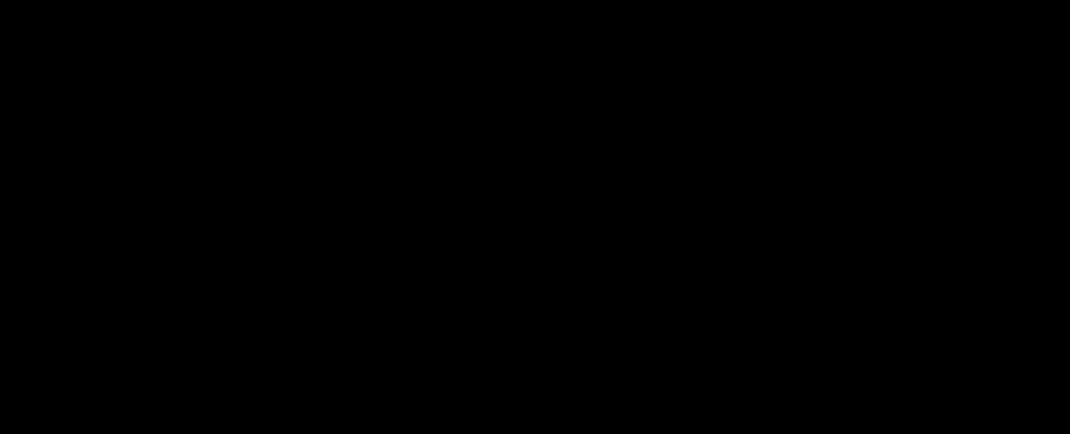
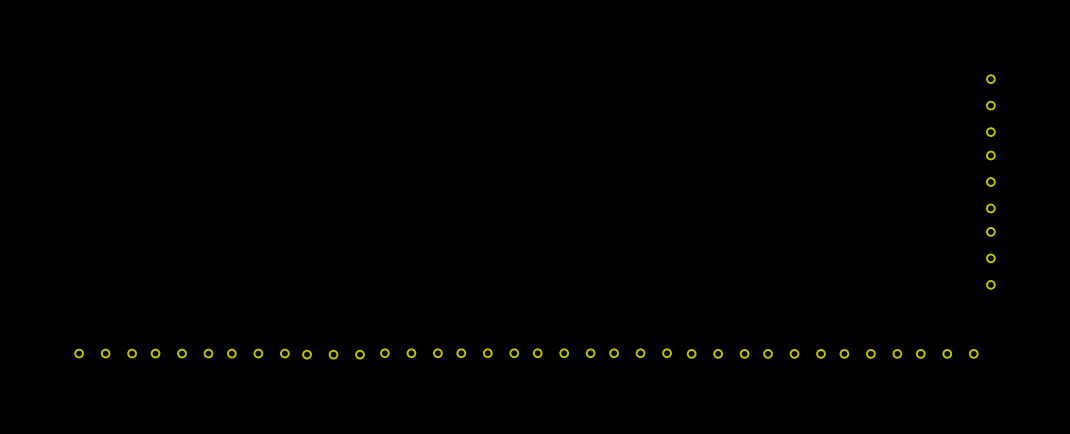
part: none -> (990, 105)
part: none -> (990, 182)
part: none -> (990, 258)
part: none -> (105, 353)
part: none -> (182, 353)
part: none -> (258, 353)
part: none -> (411, 353)
part: none -> (487, 353)
part: none -> (564, 353)
part: none -> (640, 353)
part: none -> (718, 353)
part: none -> (794, 353)
part: none -> (870, 353)
part: none -> (947, 353)
part: none -> (333, 354)

